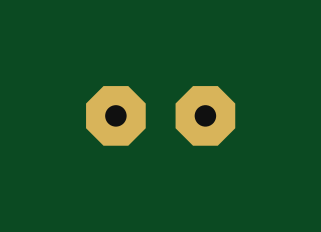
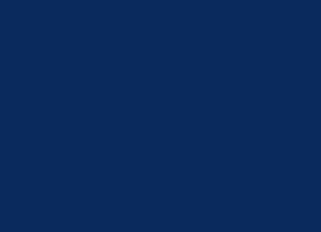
part: (115, 115) -> none
part: (205, 115) -> none

